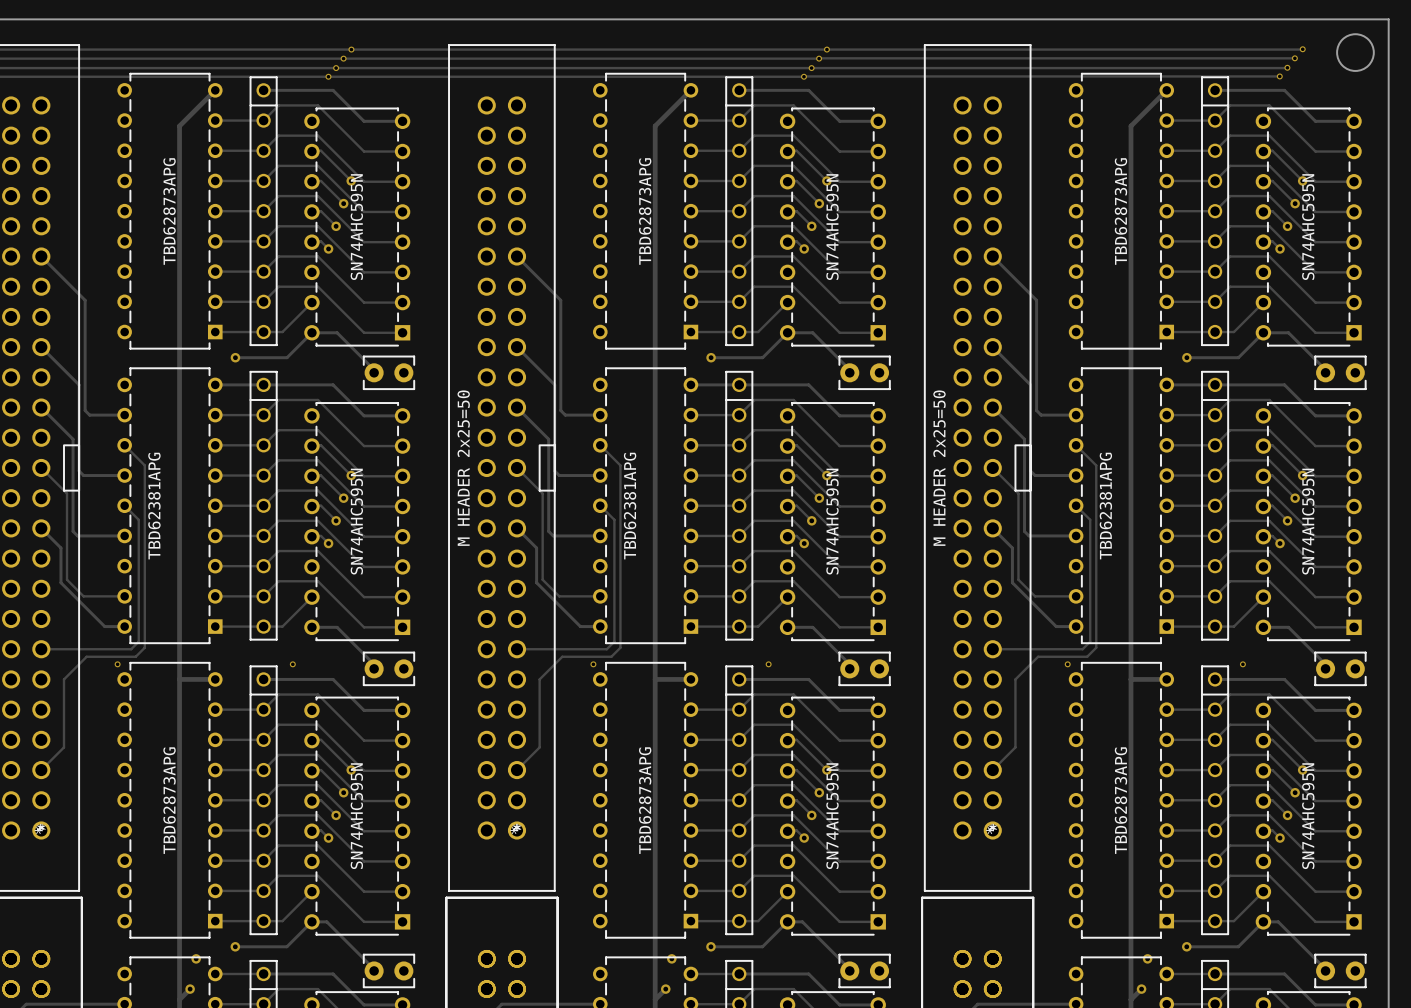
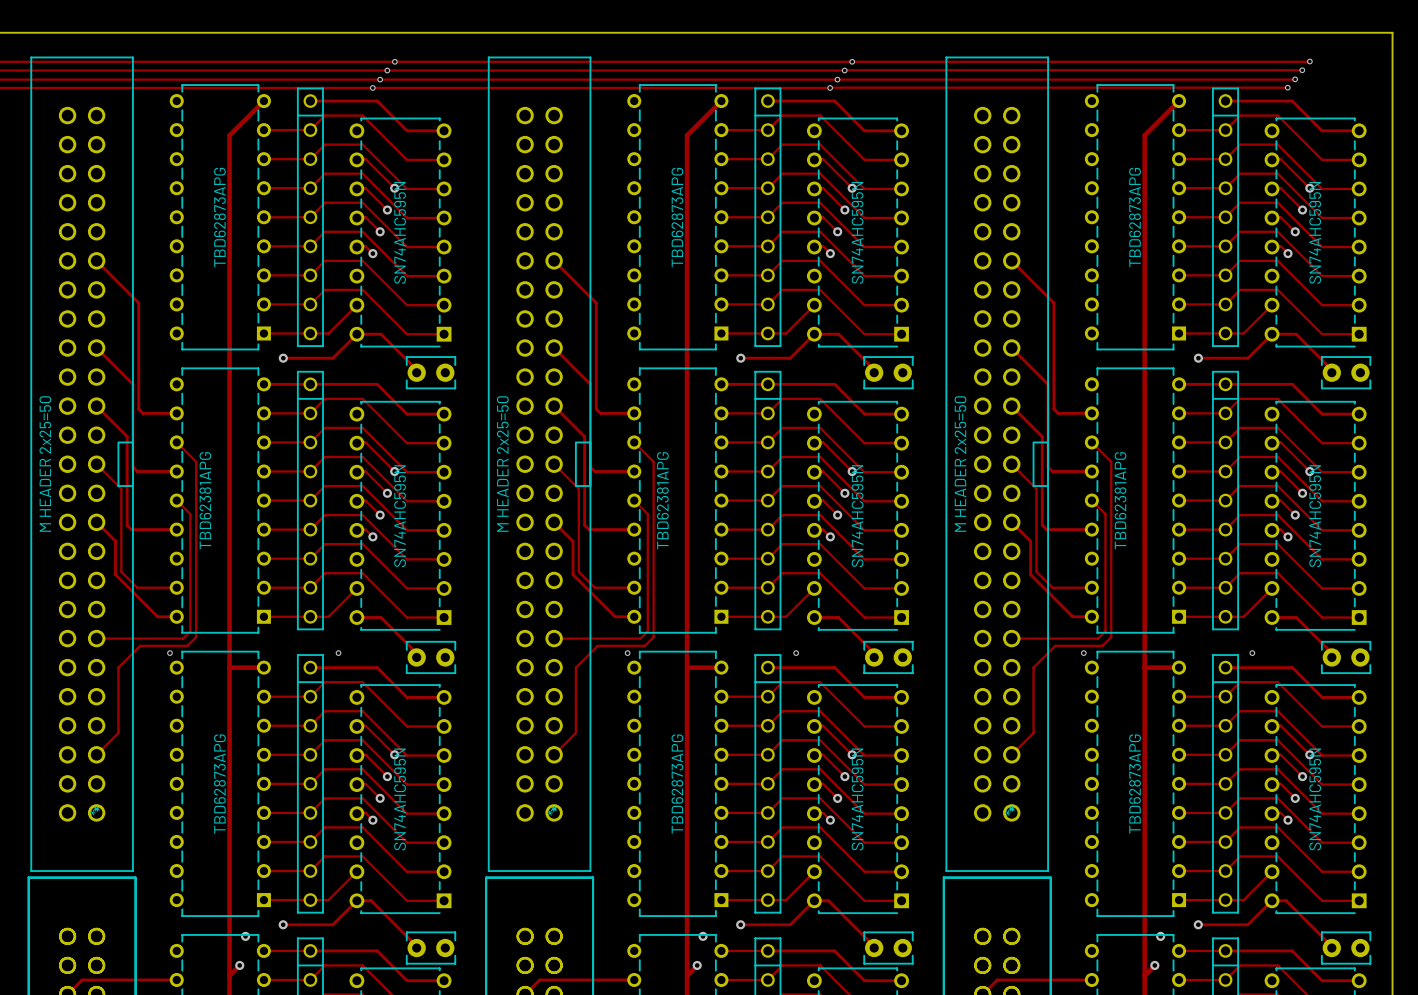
round board edge: [1336, 33, 1375, 72] -> none

